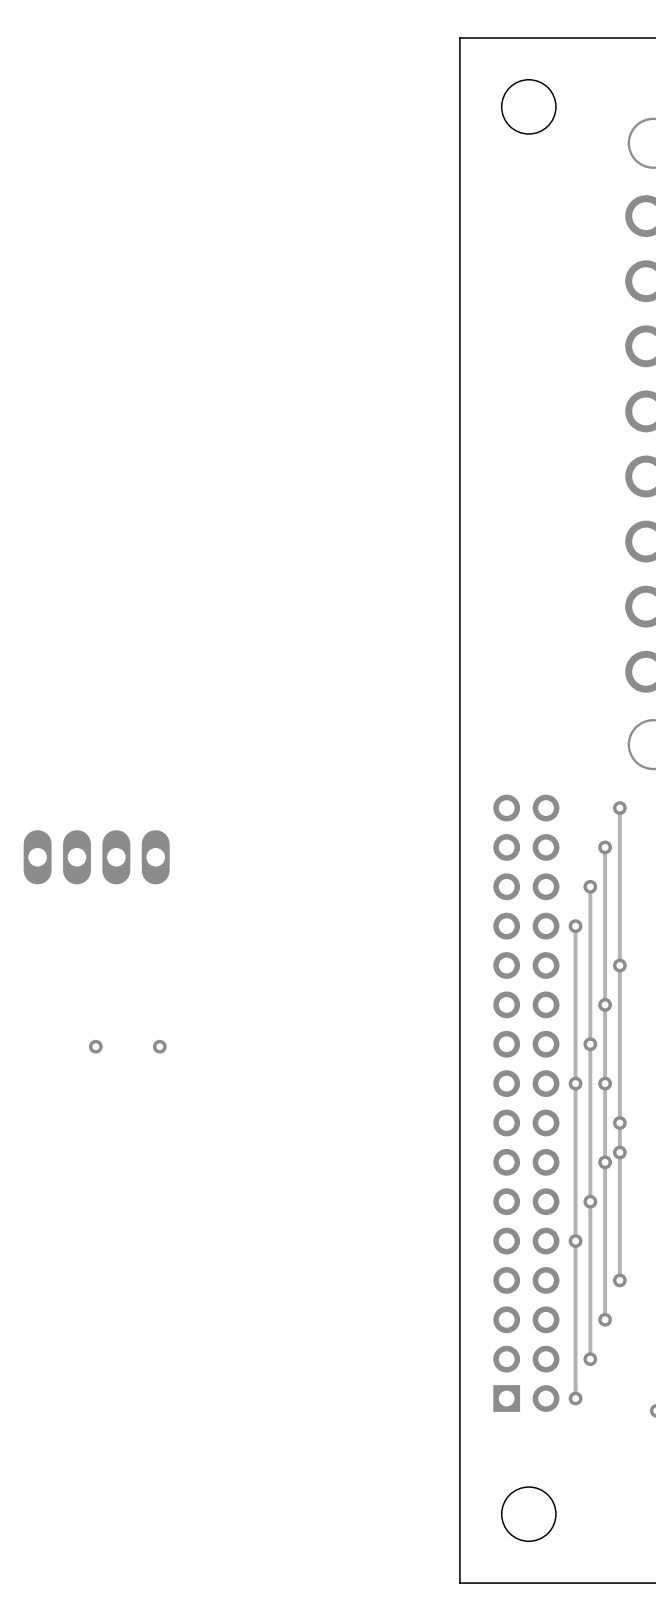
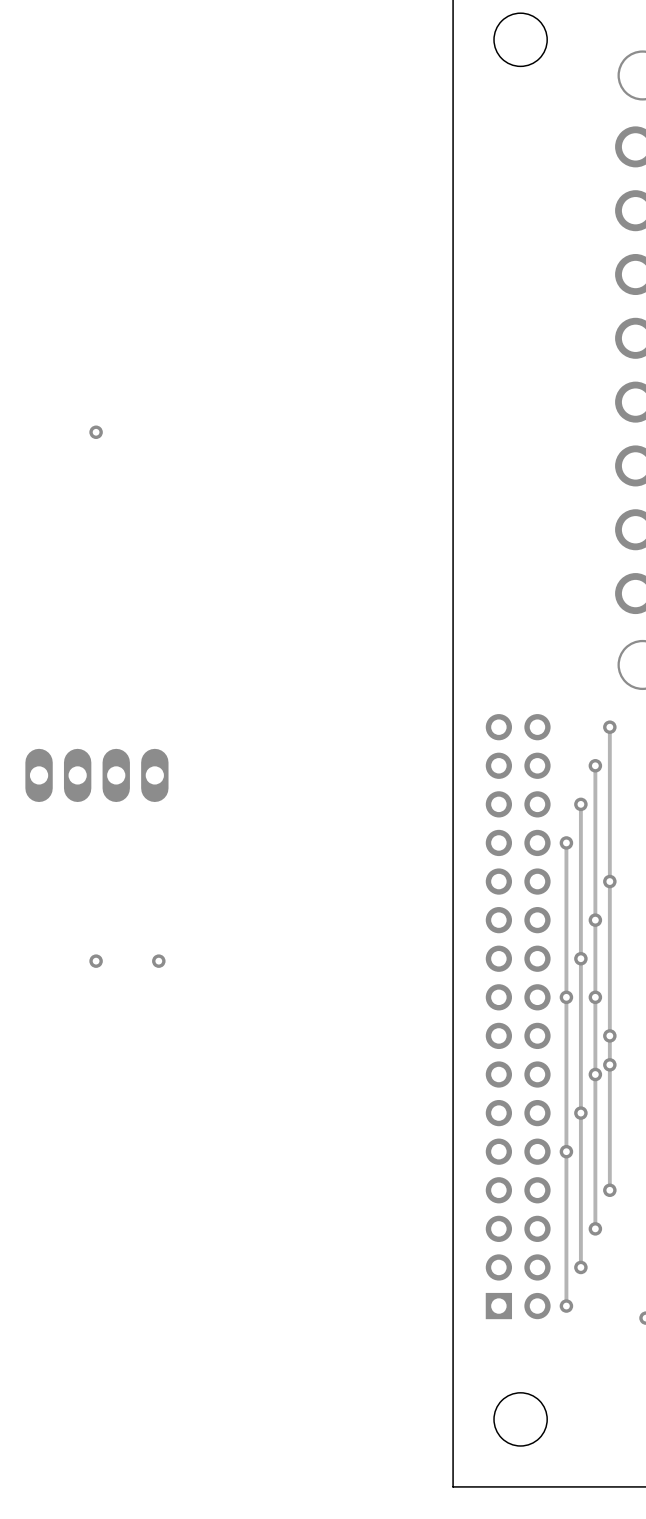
via: none -> (96, 432)

